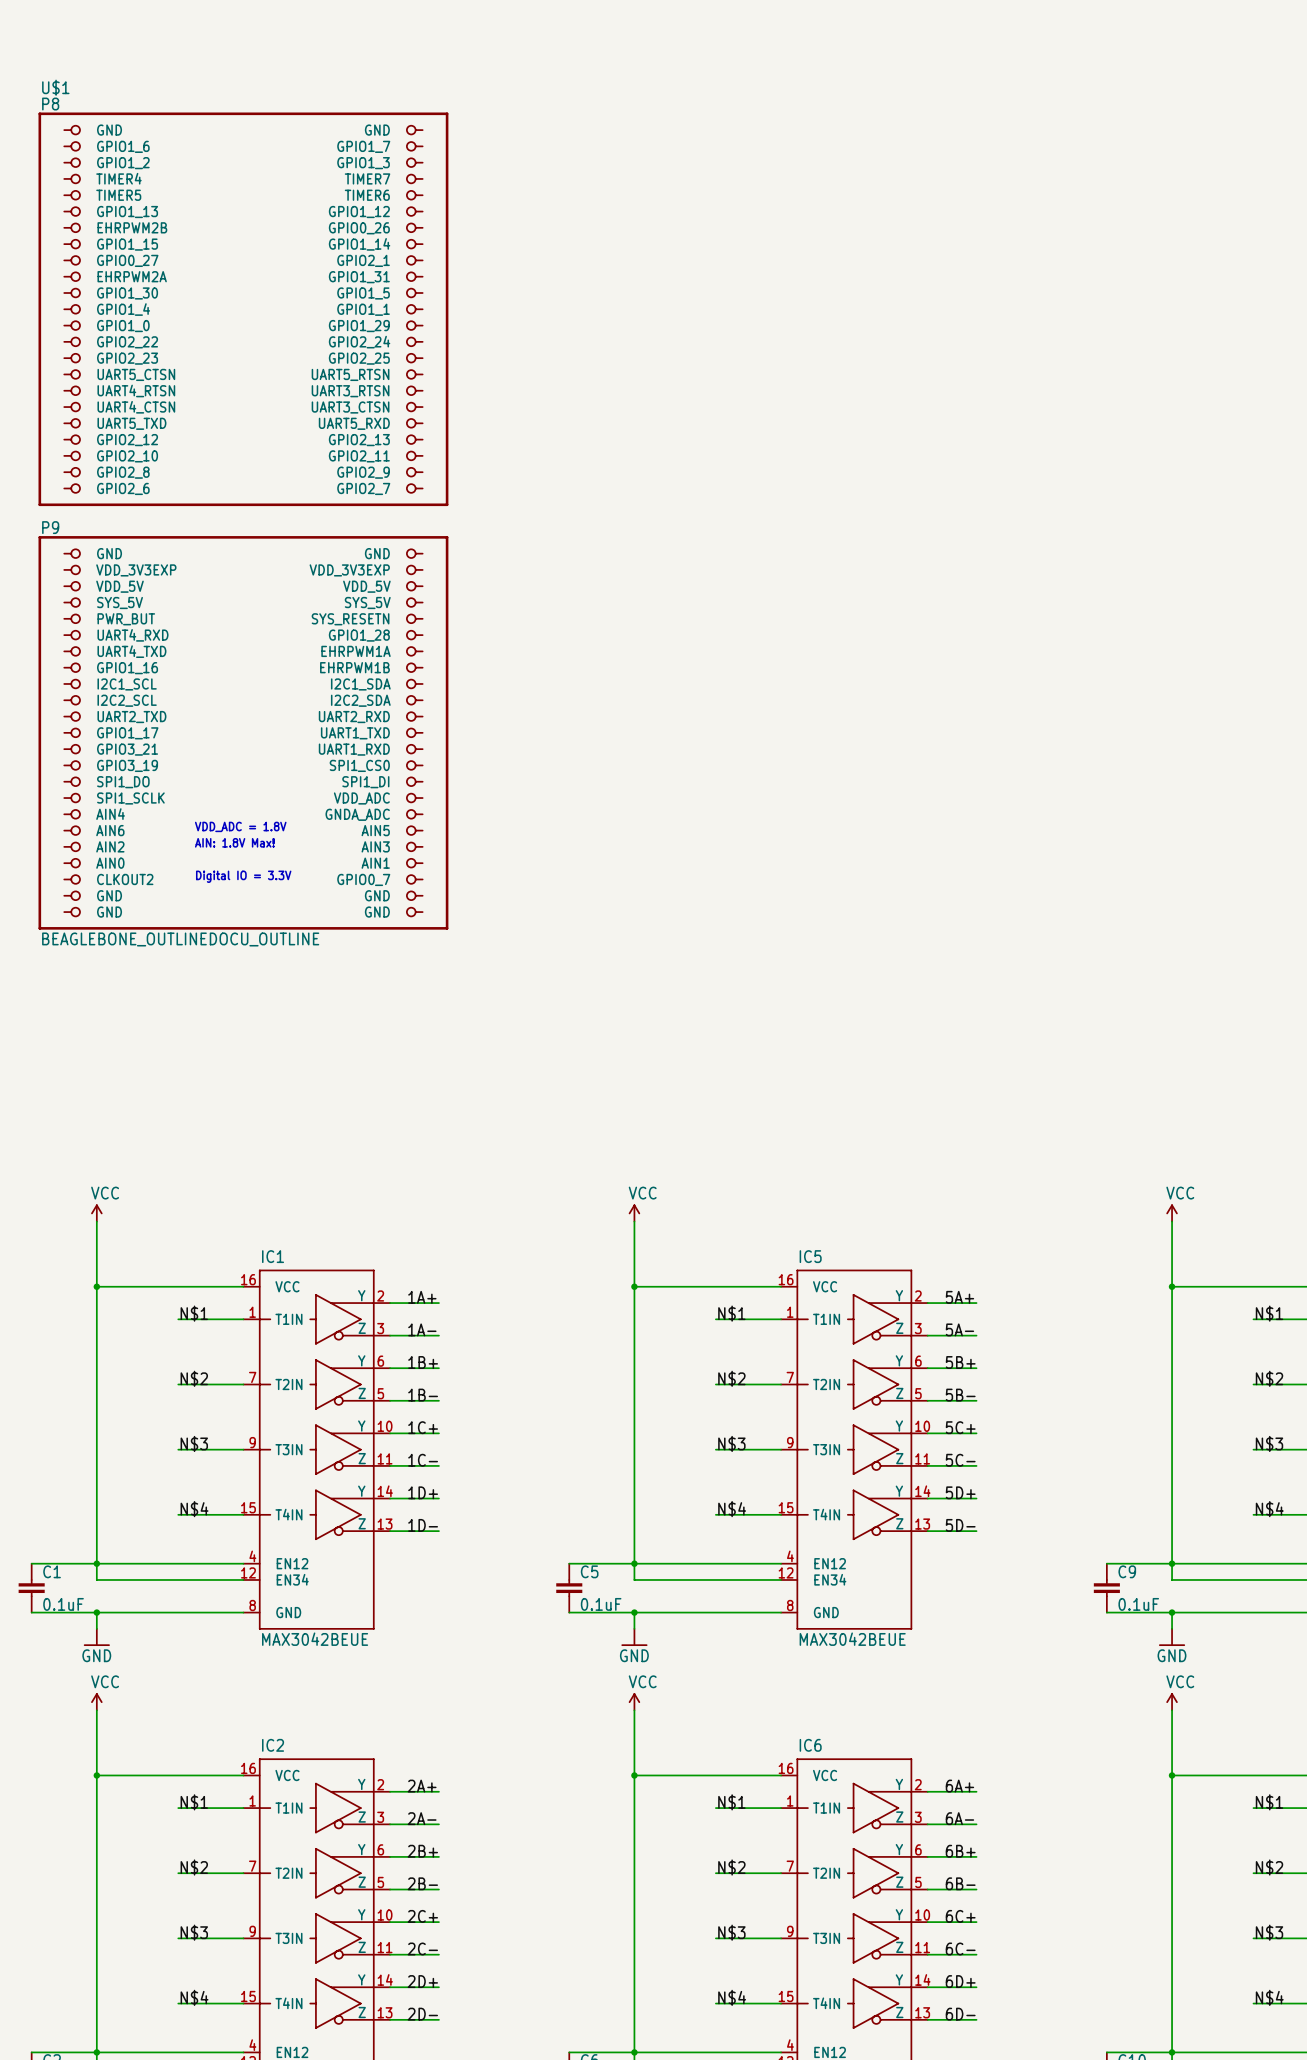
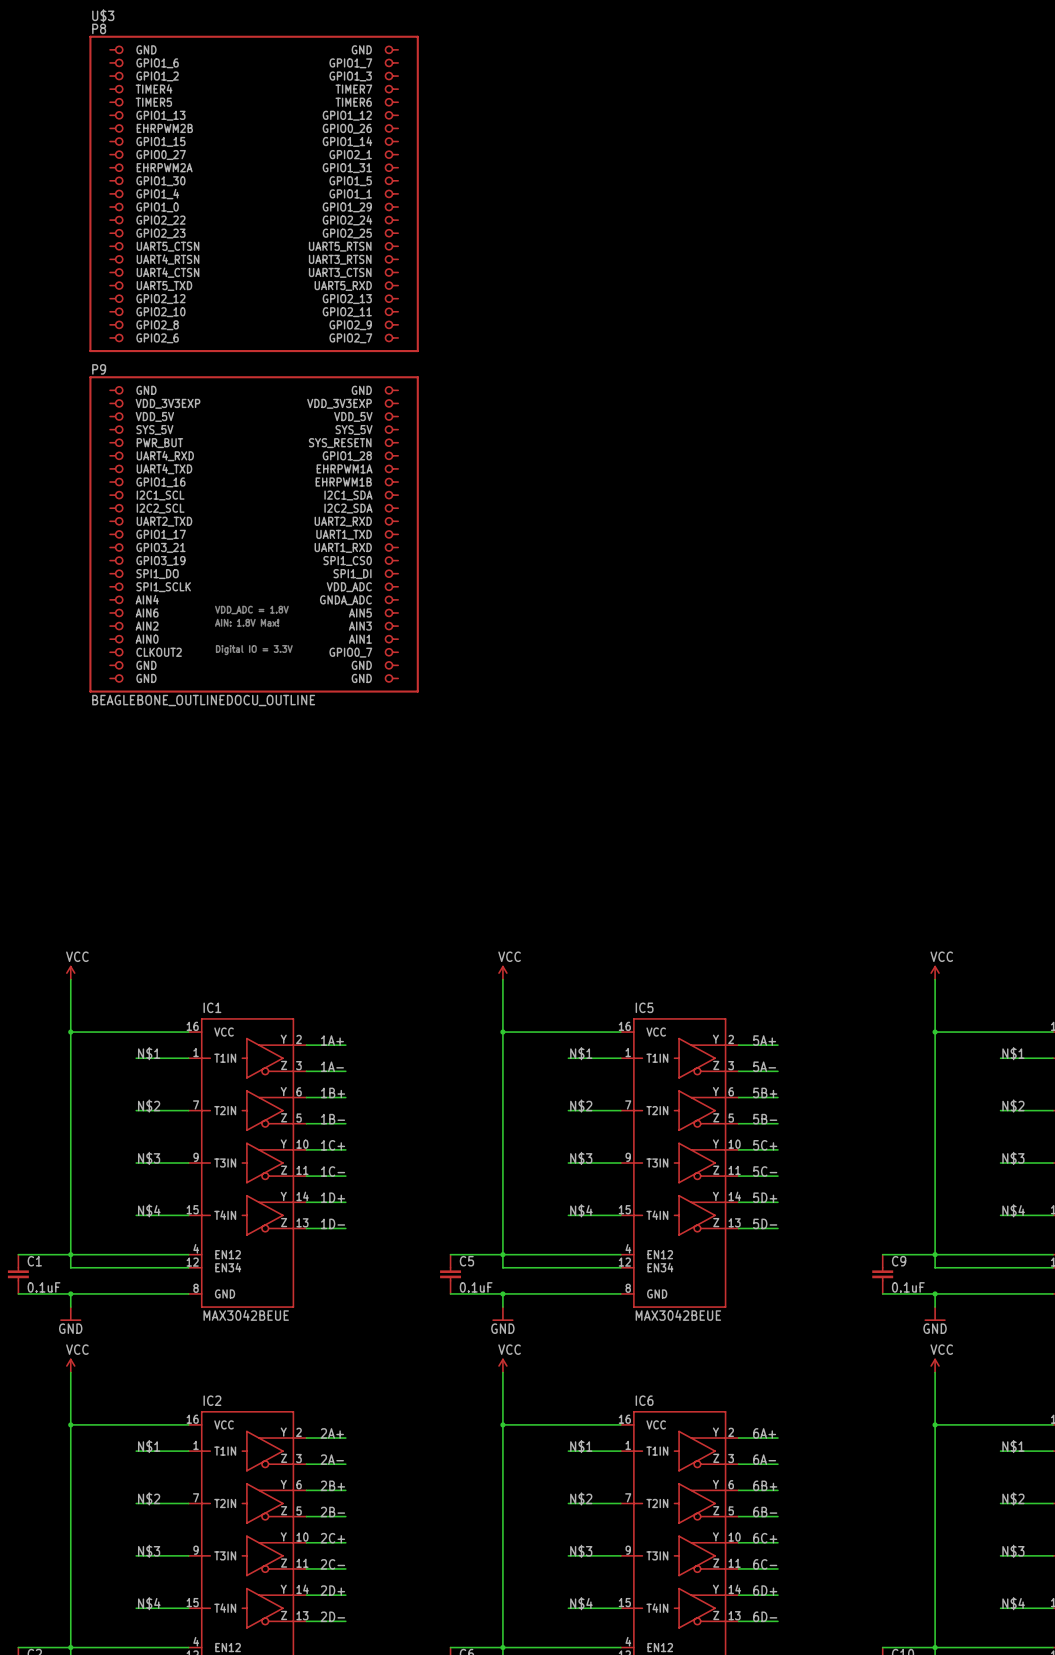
U$3: none -> BEAGLEBONE_OUTLINEDOCU_OUTLINE (254, 364)
U$1: BEAGLEBONE_OUTLINEDOCU_OUTLINE (243, 521) -> none

